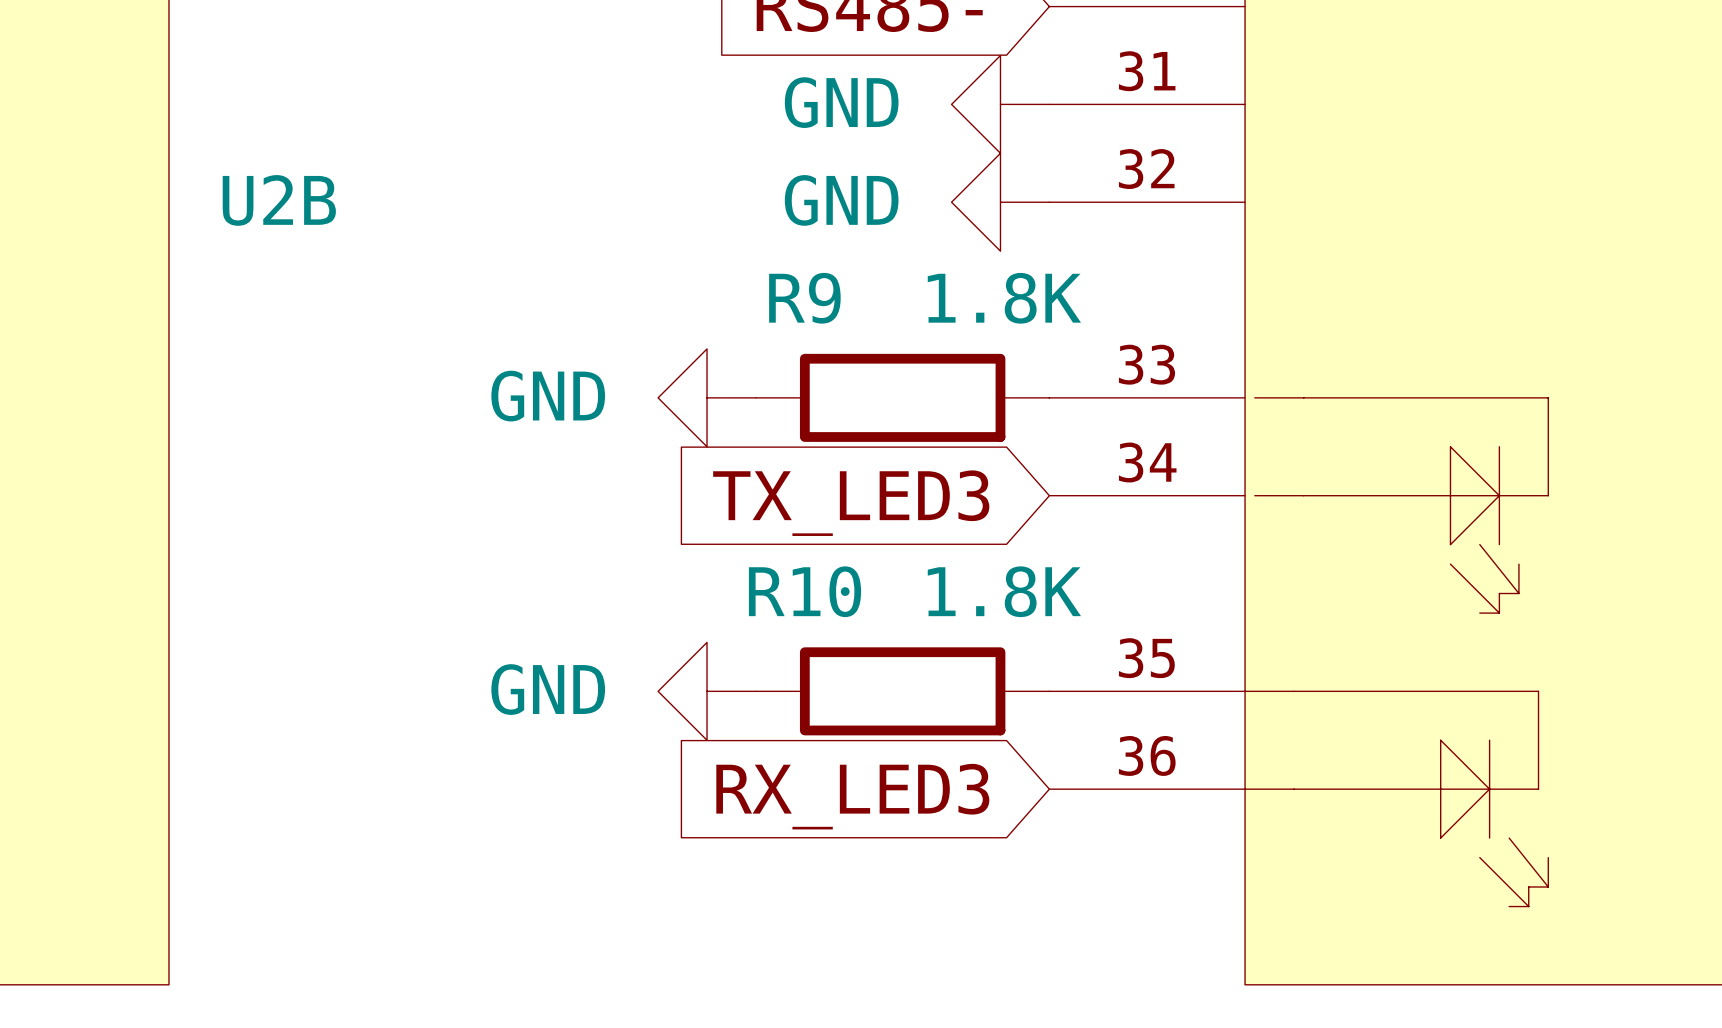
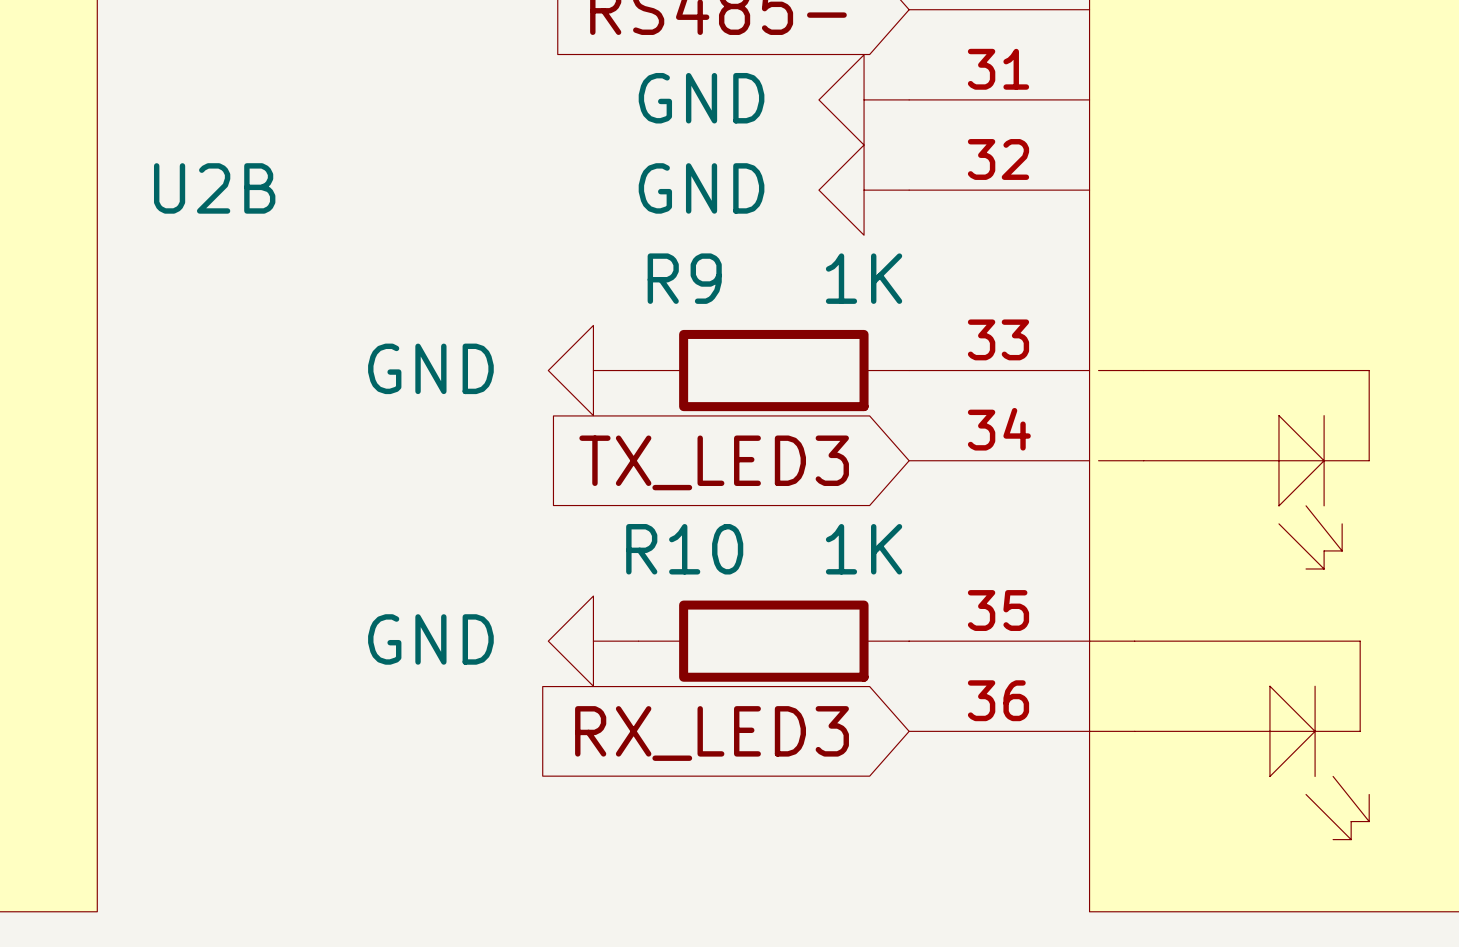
R9 value: 1.8K (1004, 298) -> 1K (864, 278)
R10 value: 1.8K (1004, 591) -> 1K (864, 549)

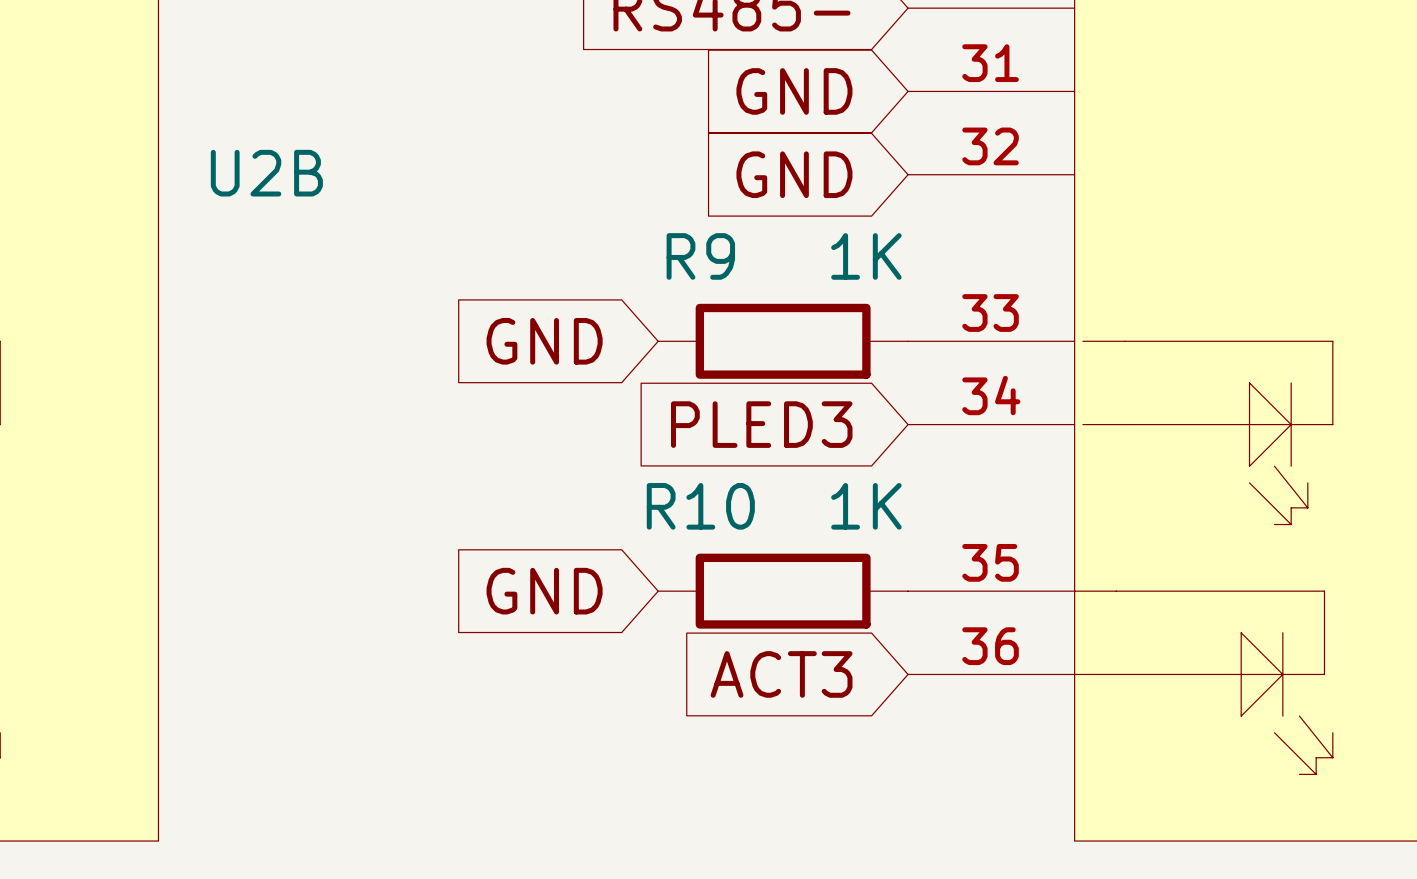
global label: none -> GND (794, 91)
power symbol: GND (864, 99) -> none
global label: none -> GND (794, 174)
power symbol: GND (864, 190) -> none
global label: none -> GND (544, 341)
power symbol: GND (593, 370) -> none
global label: TX_LED3 (714, 462) -> PLED3 (761, 424)
global label: none -> GND (544, 591)
power symbol: GND (593, 641) -> none
global label: RX_LED3 (712, 733) -> ACT3 (781, 674)

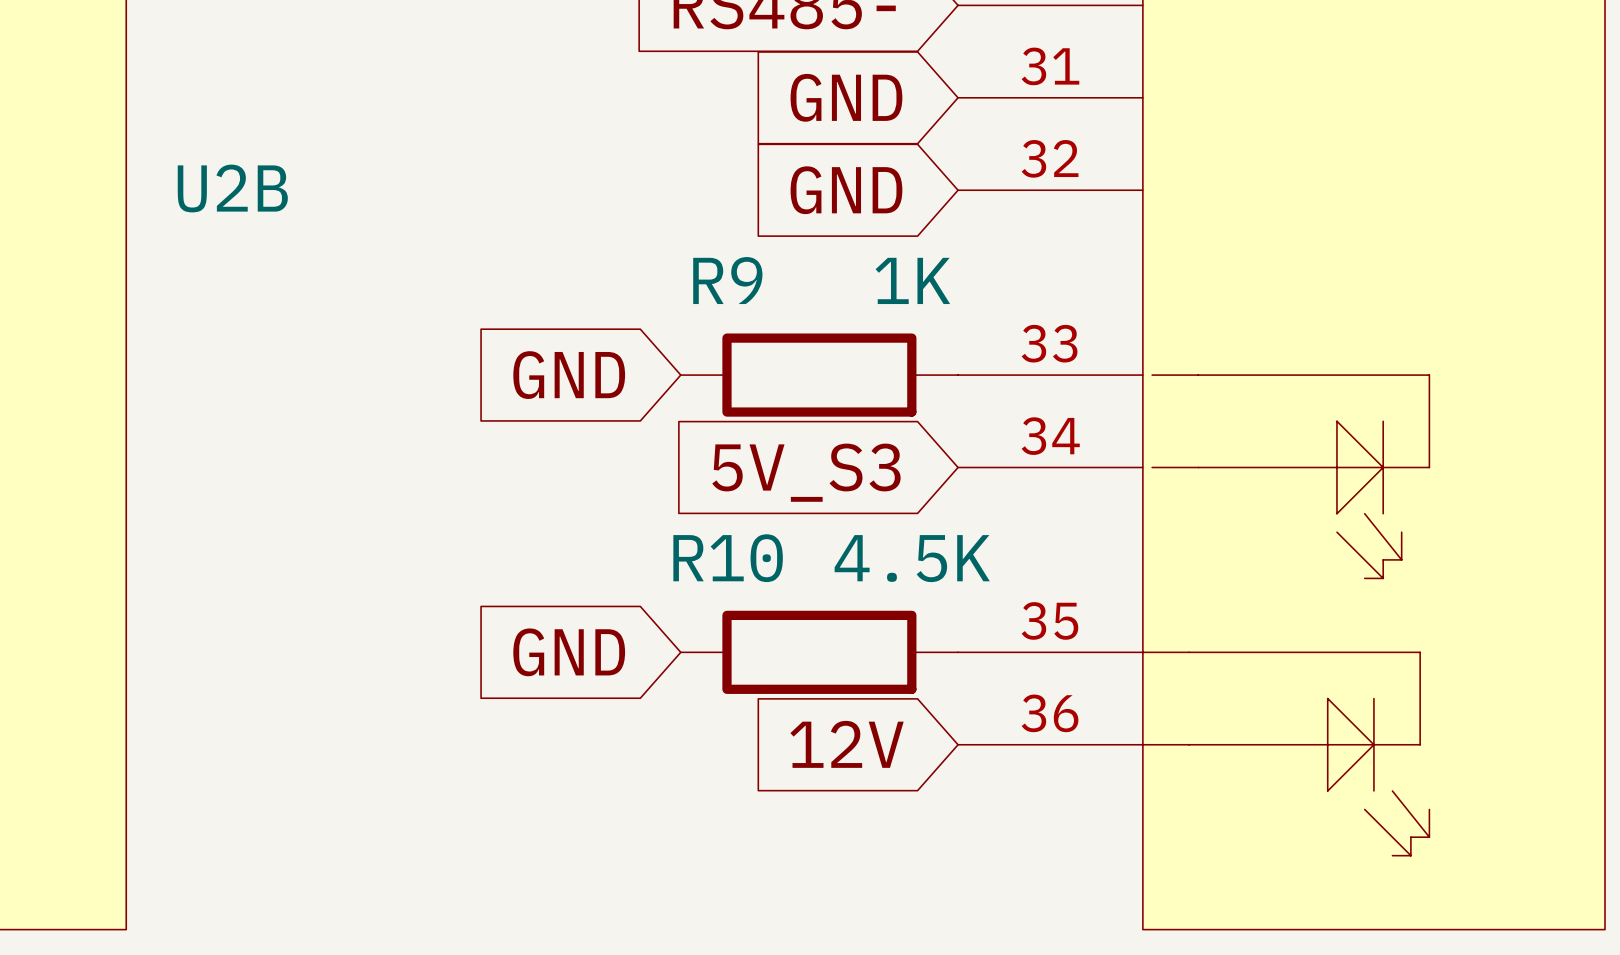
global label: PLED3 (761, 424) -> 5V_S3 (806, 472)
R10 value: 1K (866, 506) -> 4.5K (912, 558)
global label: ACT3 (781, 674) -> 12V (847, 744)

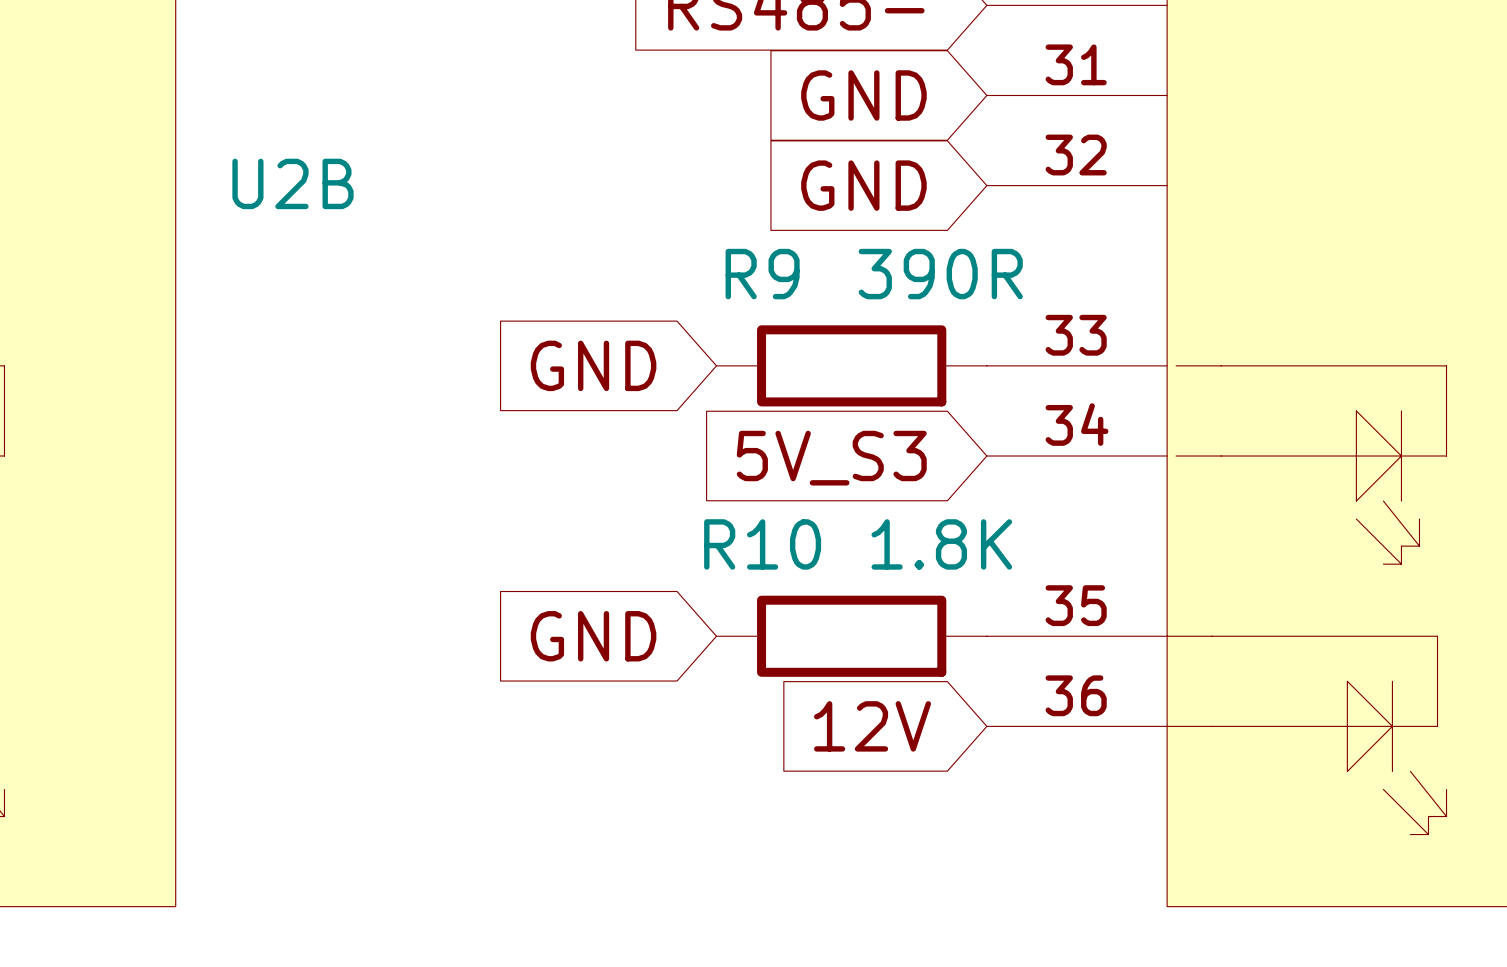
R9 value: 1K (912, 280) -> 390R (940, 274)
R10 value: 4.5K (912, 558) -> 1.8K (941, 544)

